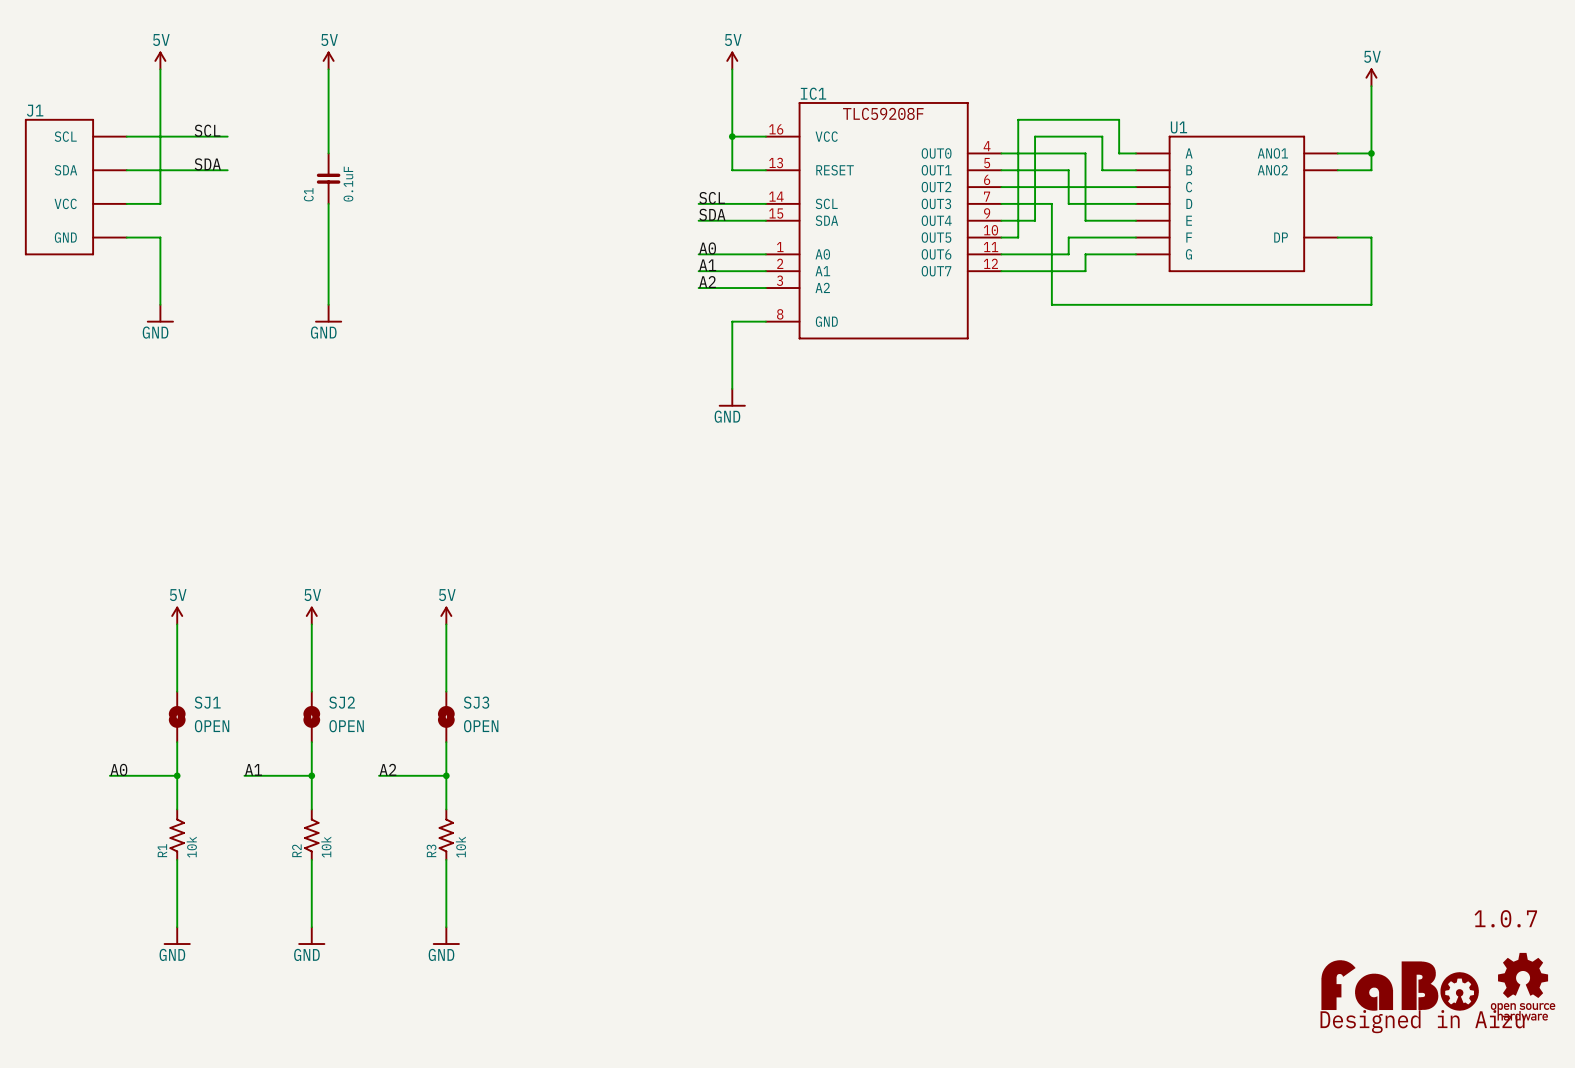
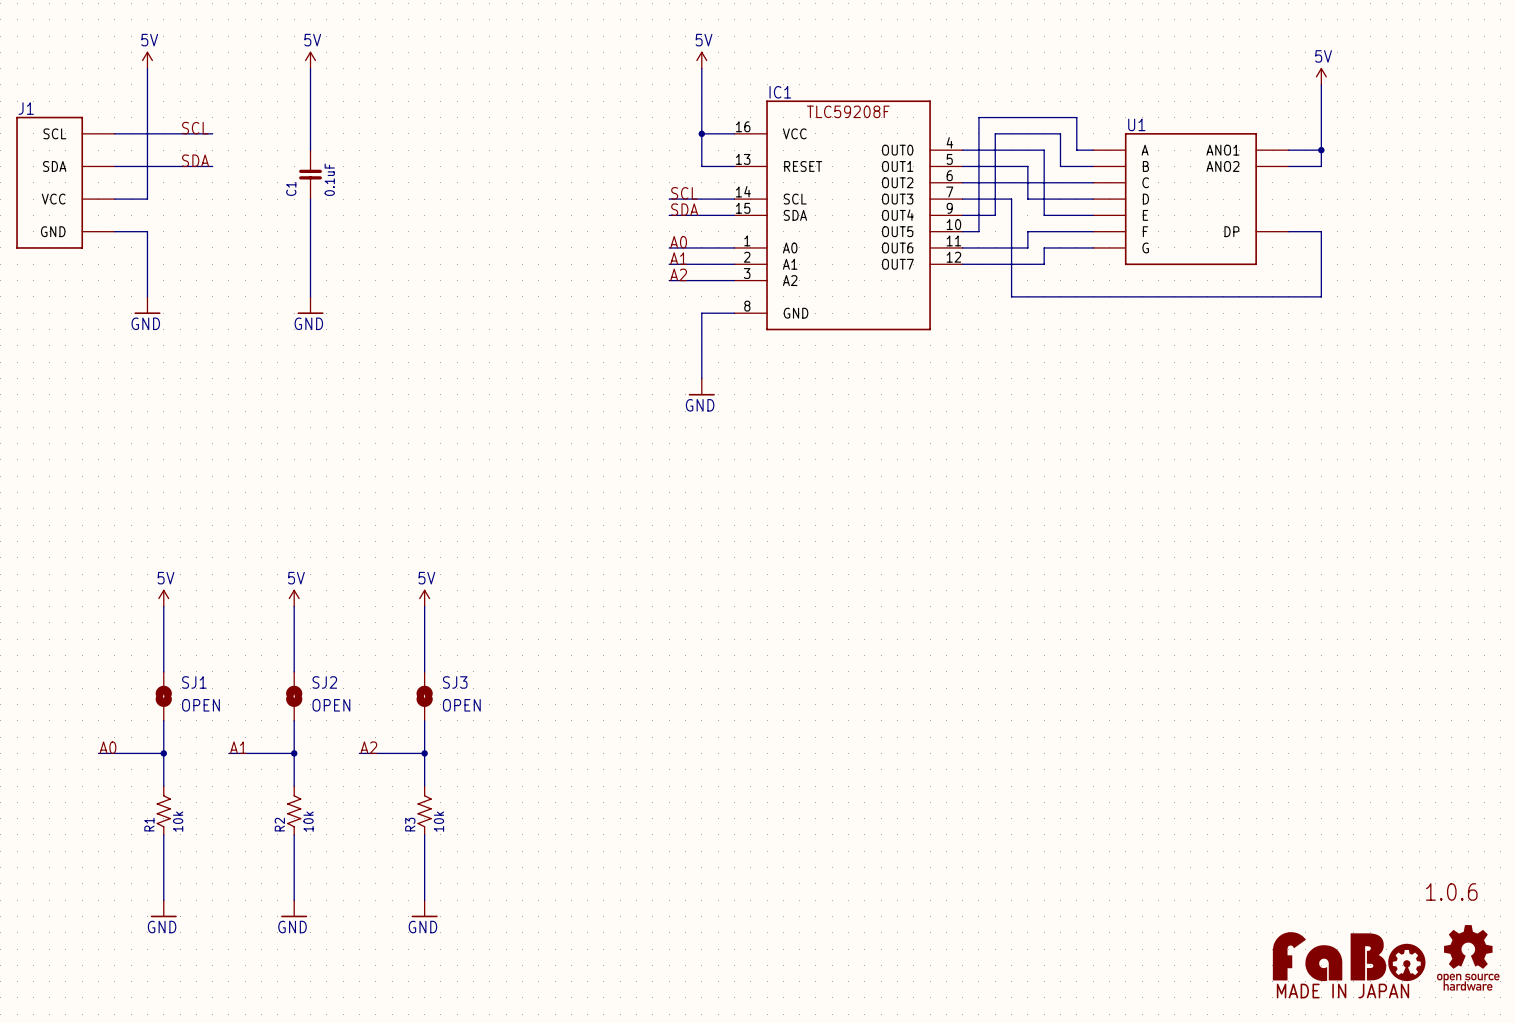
text: 1.0.7 (1505, 918) -> 1.0.6 (1451, 891)
part text: none -> MADE IN JAPAN (1342, 991)
part text: Designed in Aizu (1422, 1021) -> none

